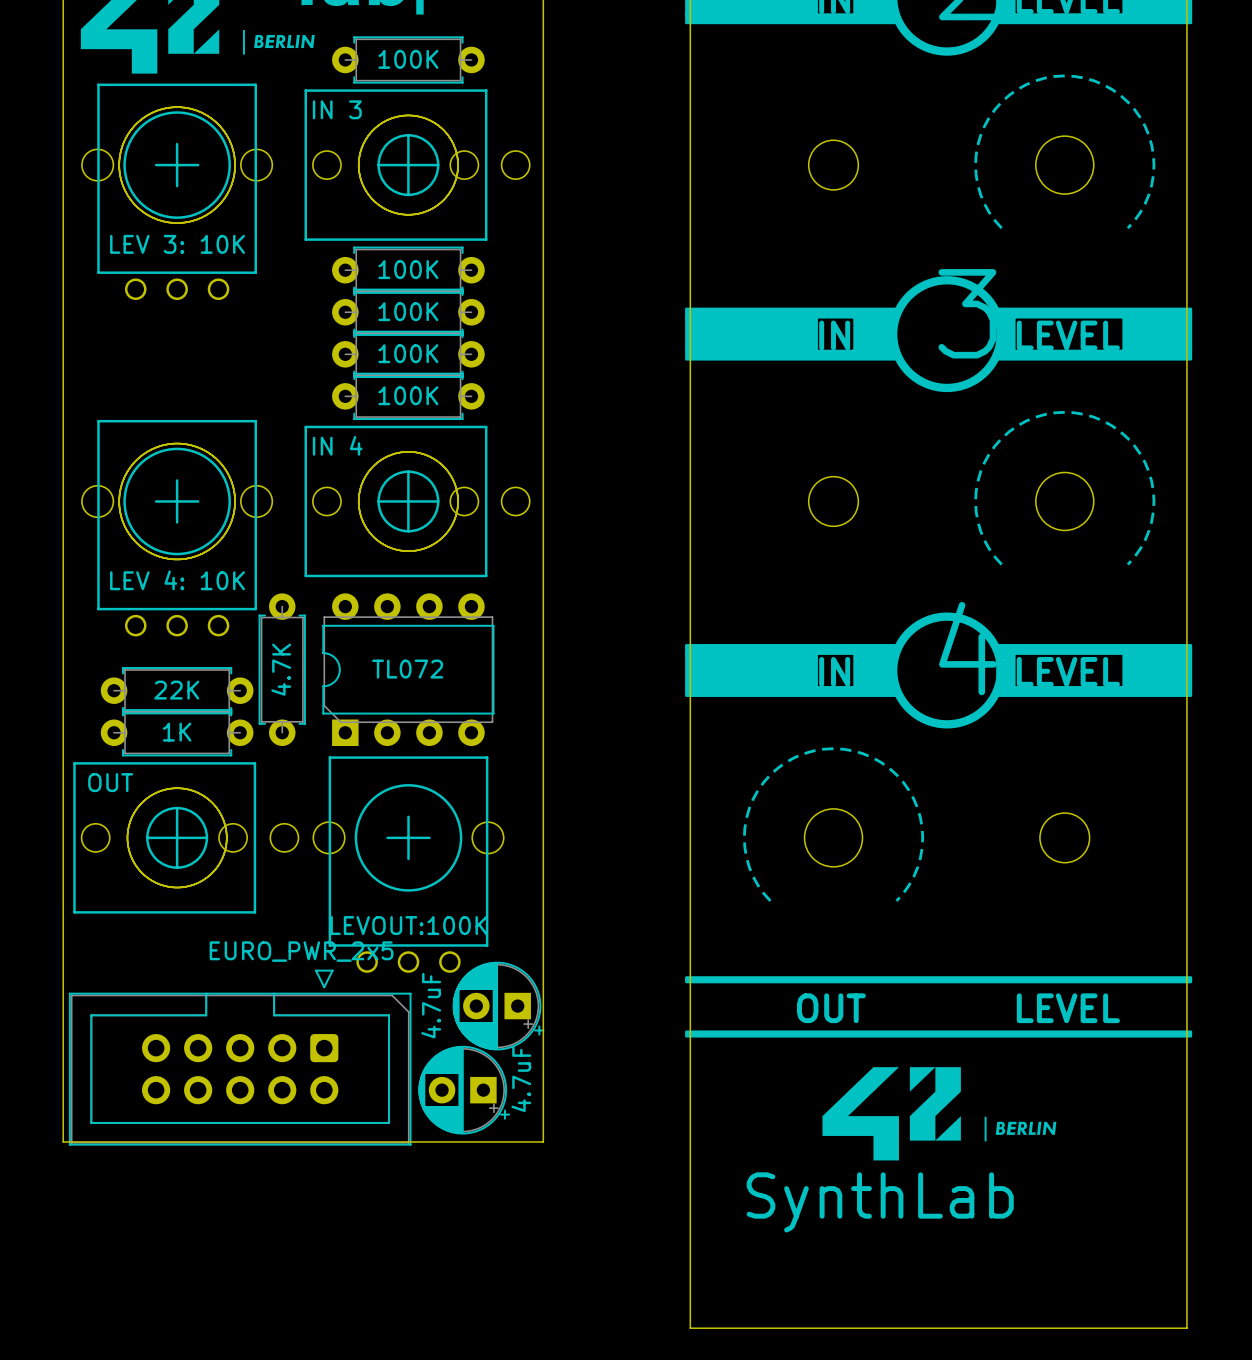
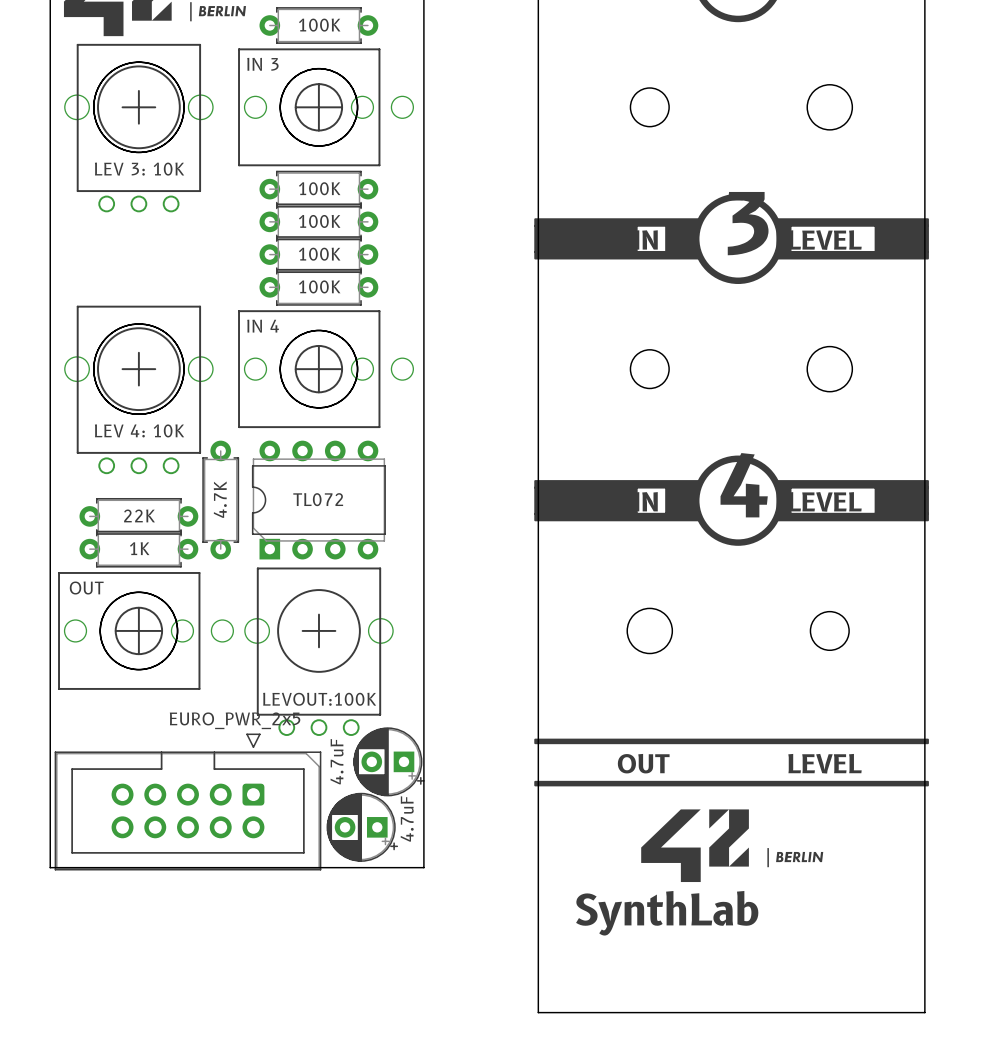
line: (1001, 228) (984, 203) (976, 175) (976, 155) (984, 126) (995, 109) (1017, 89) (1035, 80) (1064, 75) (1094, 80) (1120, 95) (1134, 109) (1148, 135) (1153, 165) (1151, 184) (1140, 212) (1127, 228) -> none
line: (1001, 564) (984, 540) (976, 511) (976, 491) (984, 462) (1001, 438) (1017, 425) (1044, 414) (1064, 412) (1084, 414) (1112, 425) (1134, 445) (1148, 472) (1153, 491) (1151, 521) (1145, 540) (1127, 564) -> none
line: (770, 900) (753, 876) (746, 857) (744, 827) (753, 799) (770, 774) (786, 762) (813, 750) (833, 748) (853, 750) (880, 762) (896, 774) (913, 799) (922, 827) (922, 847) (913, 876) (896, 900) -> none

